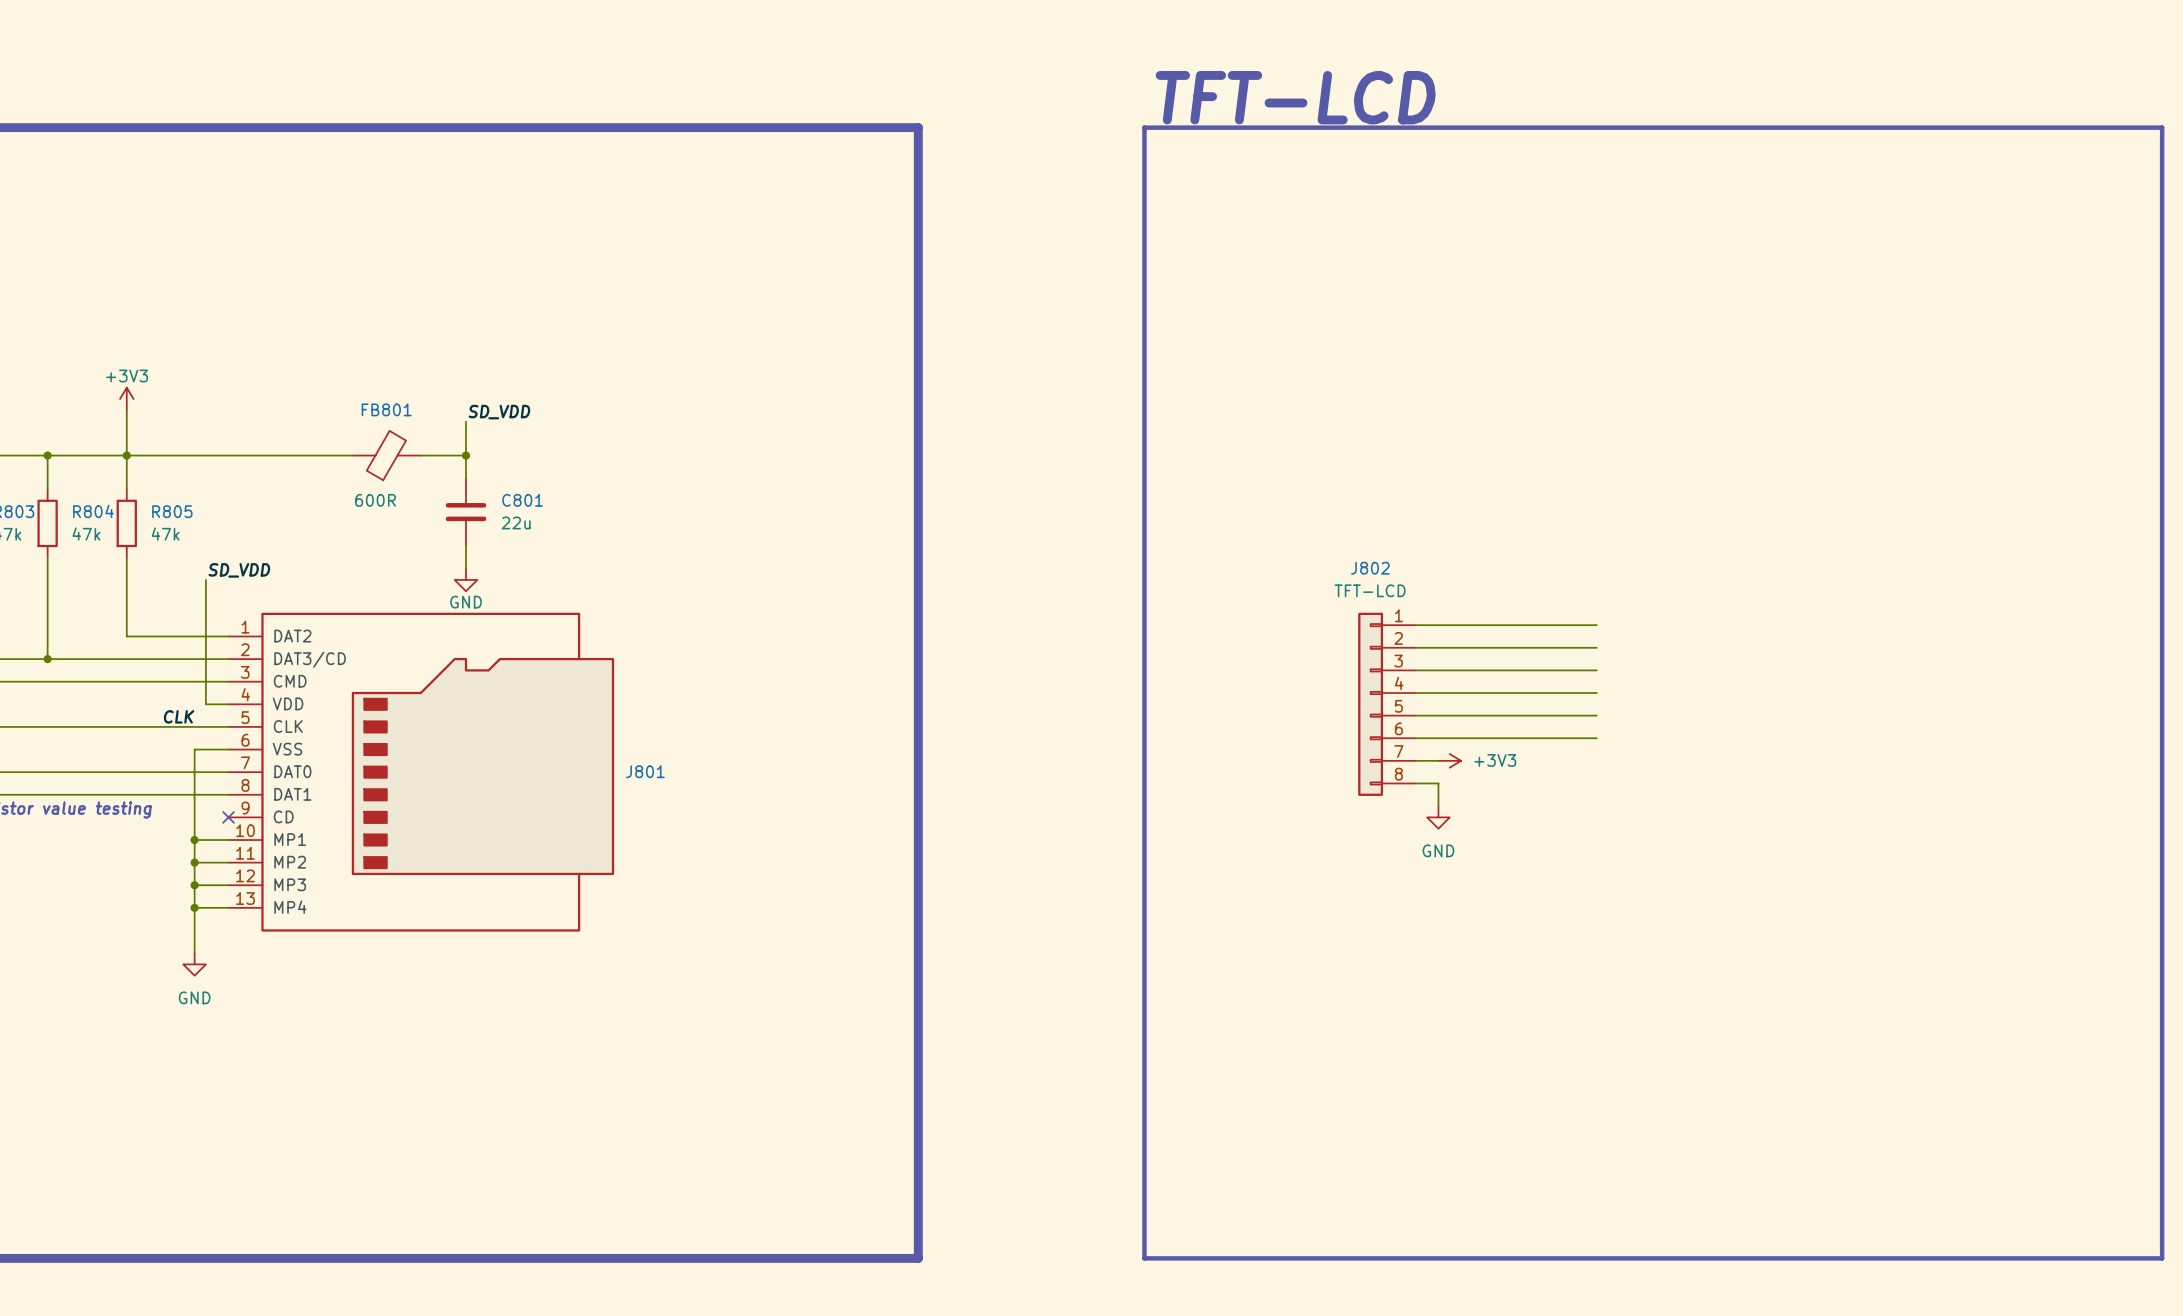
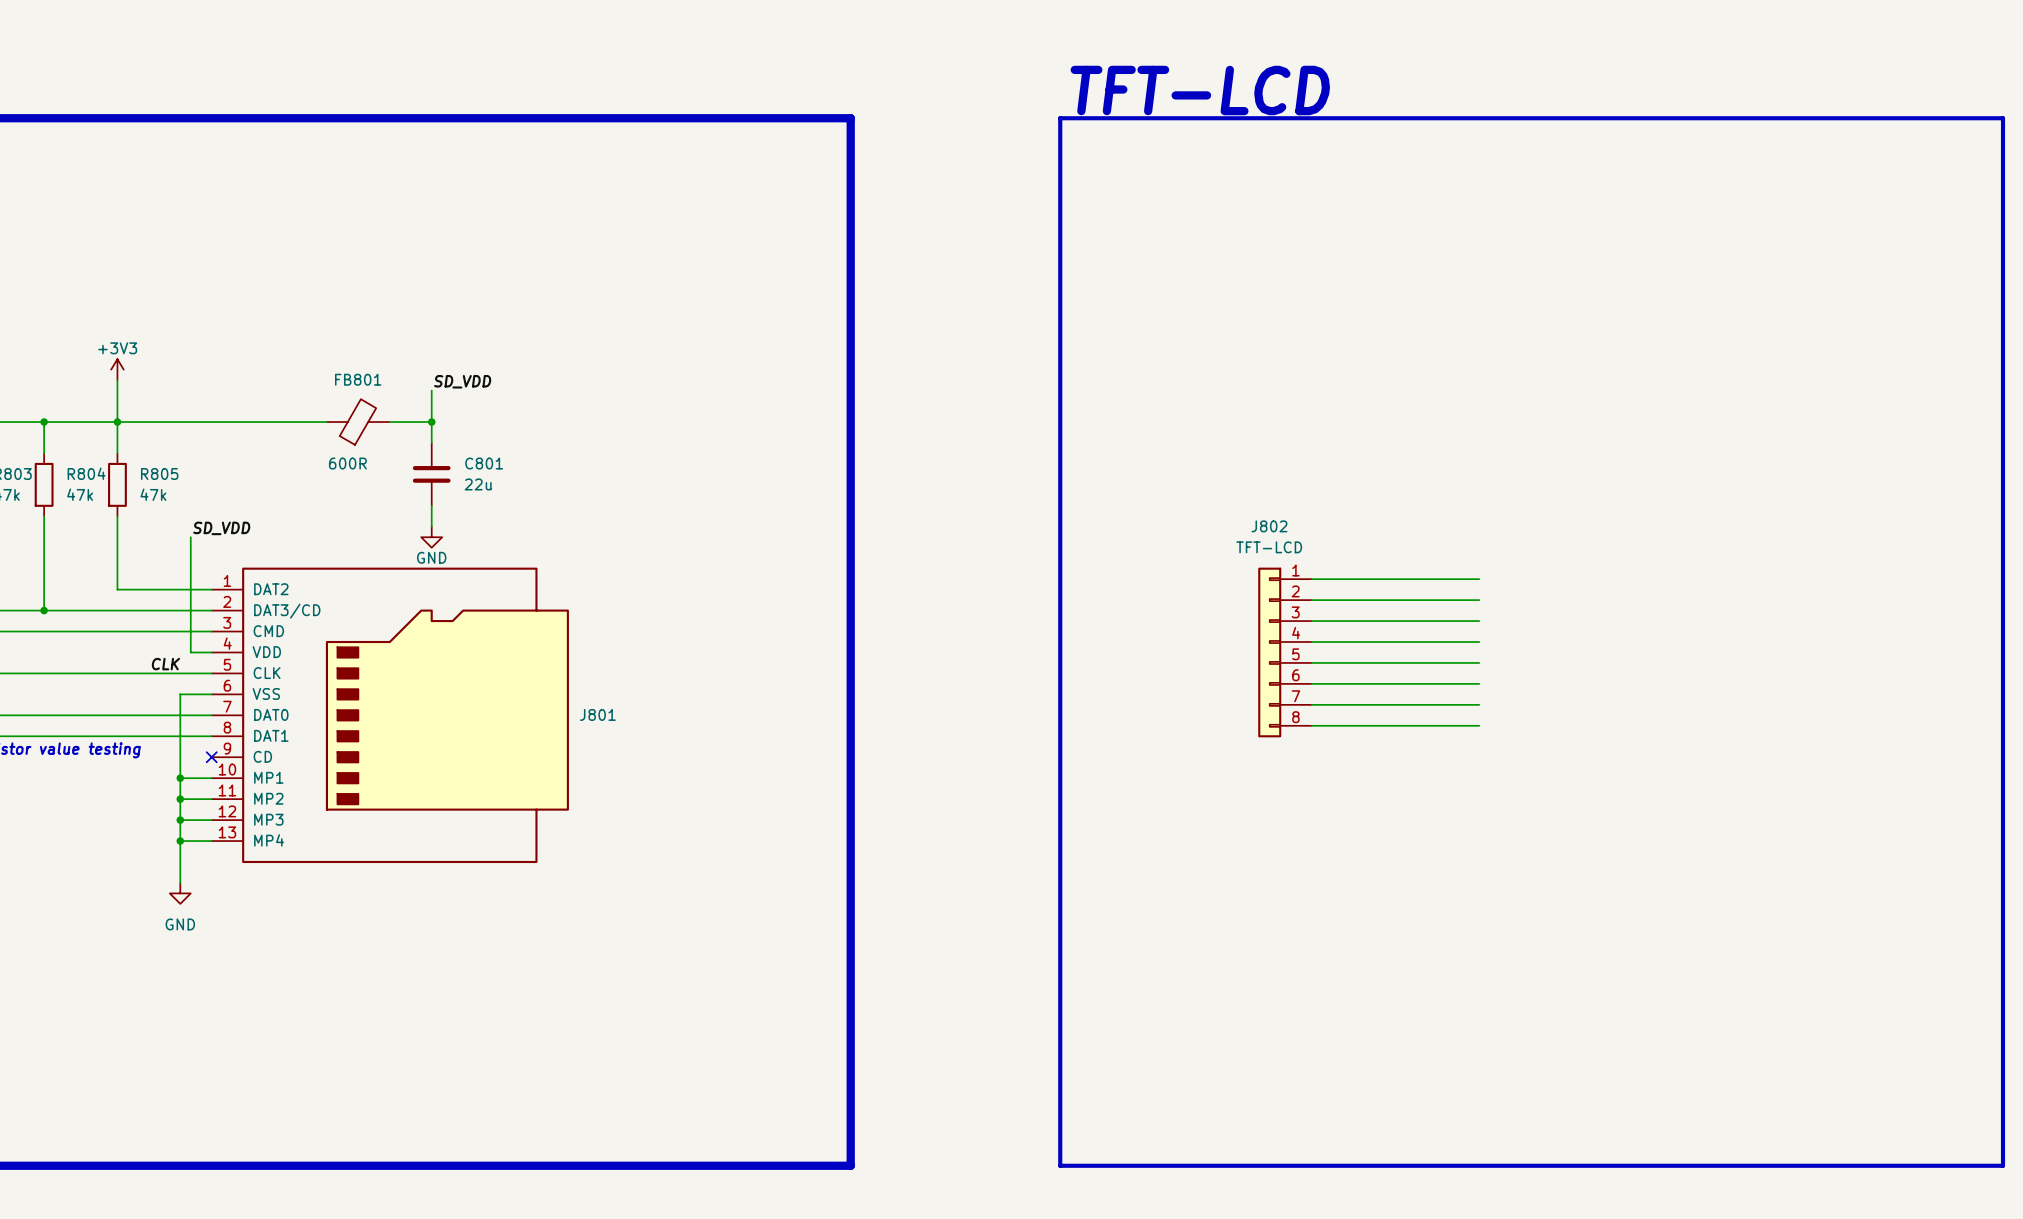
wire: none -> (1332, 704) (1479, 704)
power symbol: +3V3 (1449, 760) -> none
wire: (1438, 783) (1438, 806) -> (1332, 725) (1479, 725)
power symbol: GND (1438, 817) -> none

